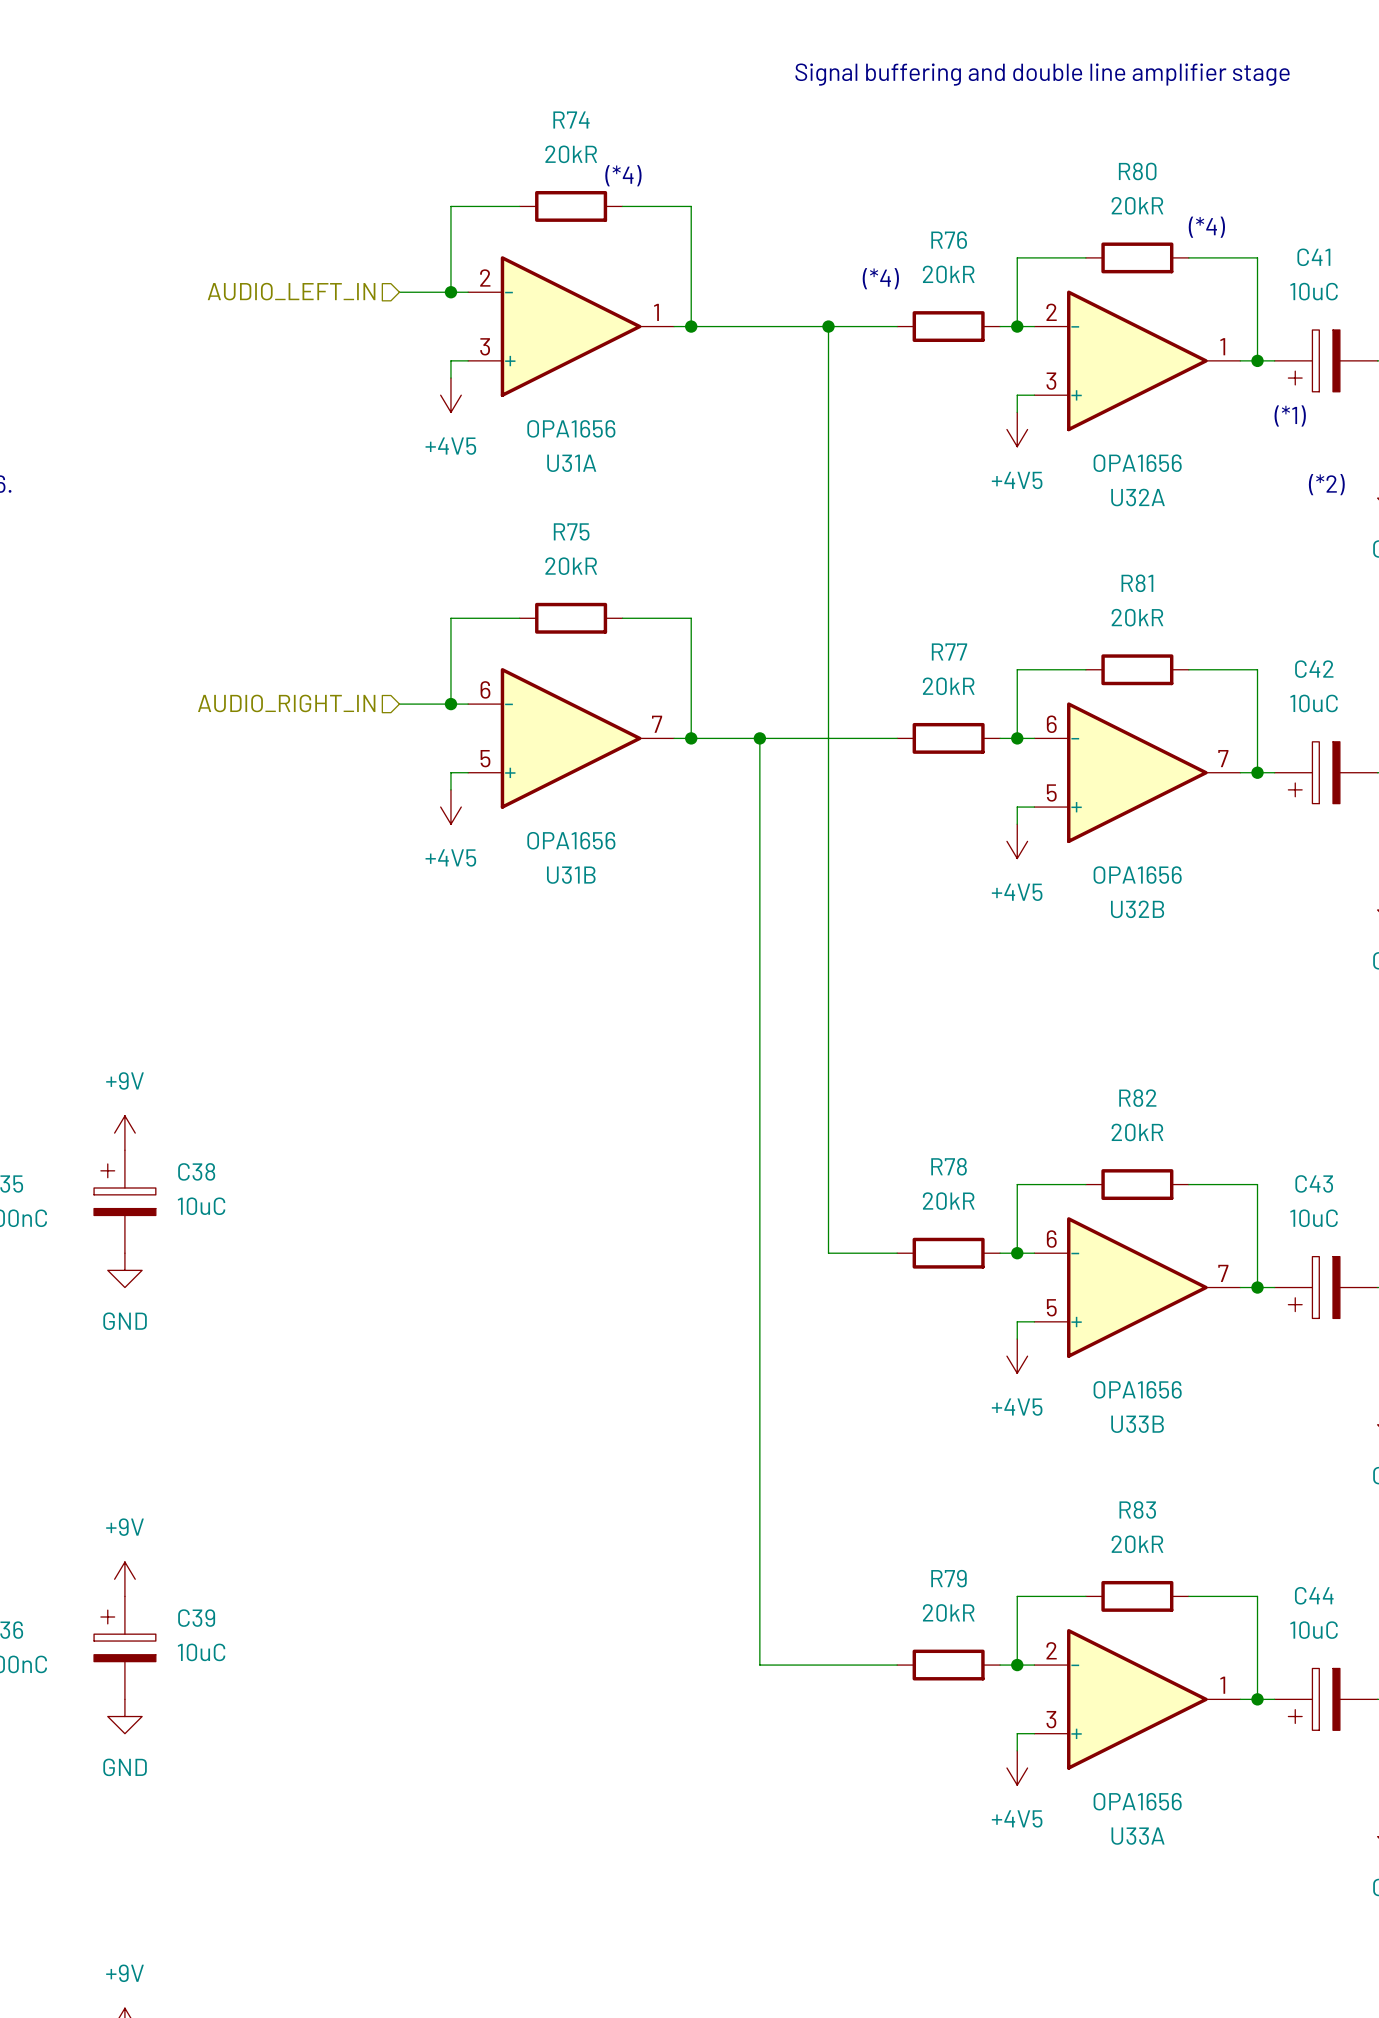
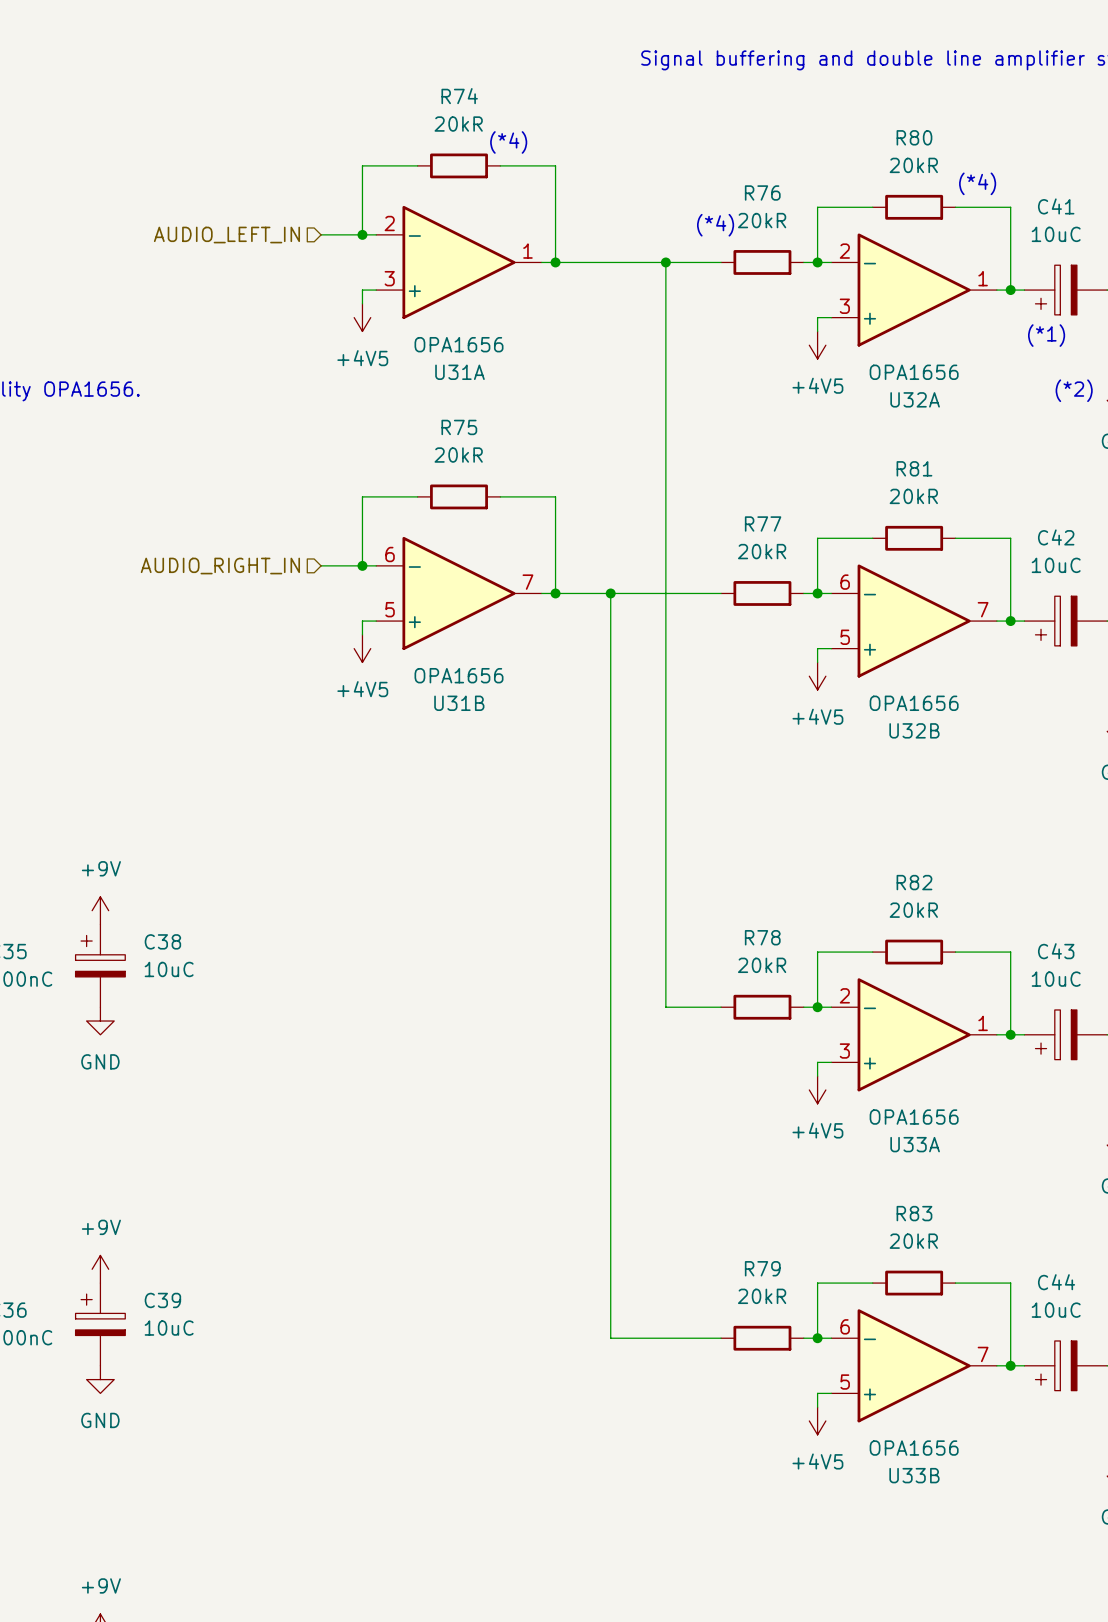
U33B position: (1137, 1287) -> (914, 1365)
U33A position: (1137, 1699) -> (914, 1034)

